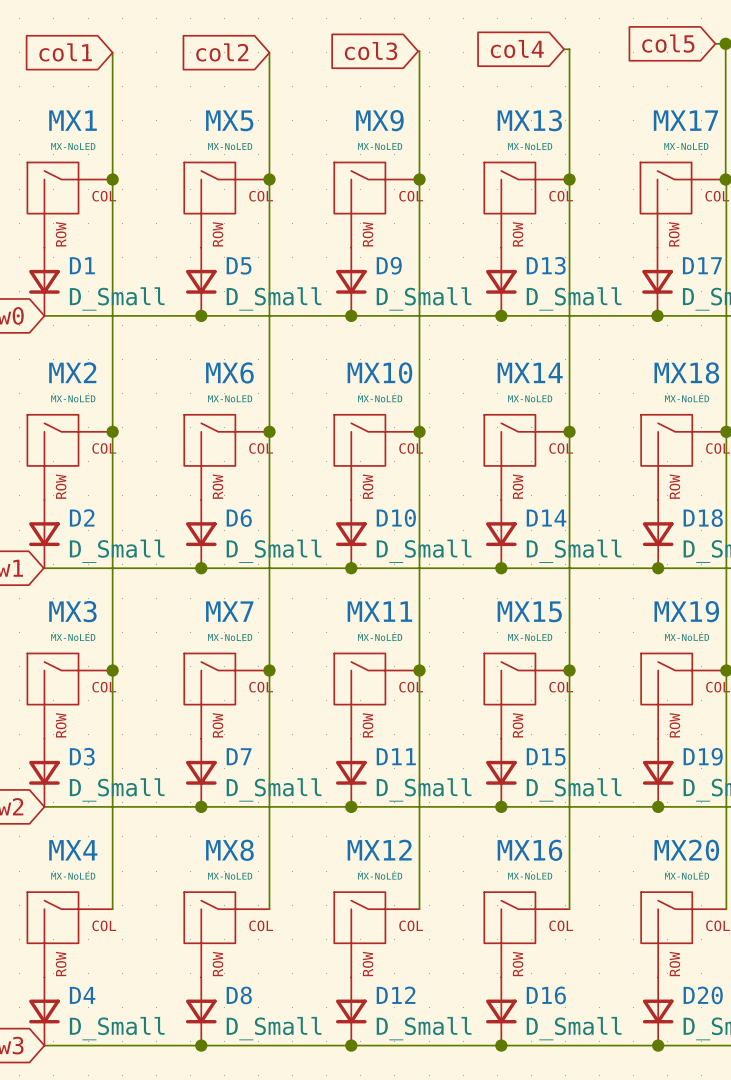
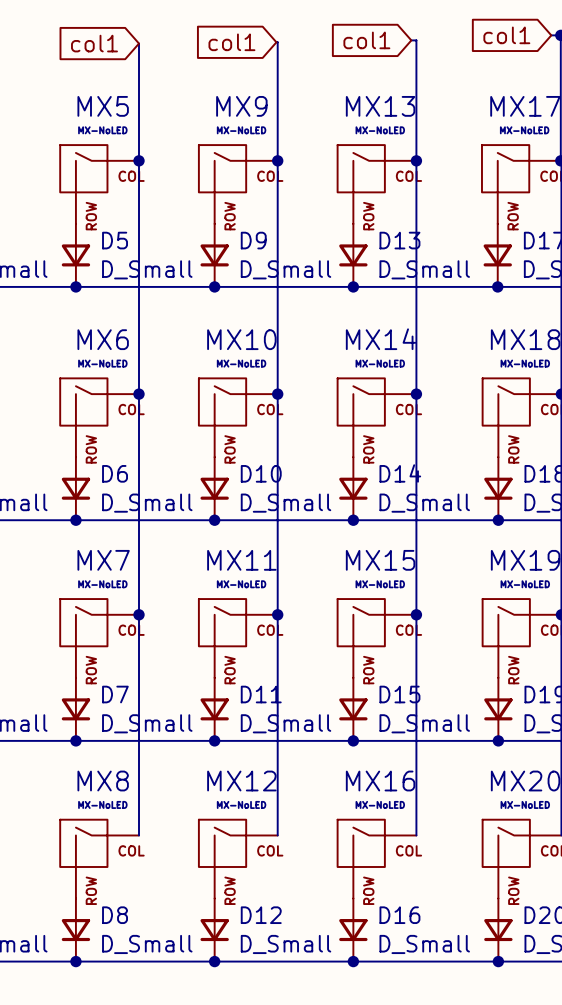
global label: col5 (668, 43) -> col1 (506, 35)
global label: col4 (517, 49) -> col1 (366, 40)
global label: col3 (371, 51) -> col1 (231, 42)
global label: col2 (222, 52) -> col1 (94, 43)

